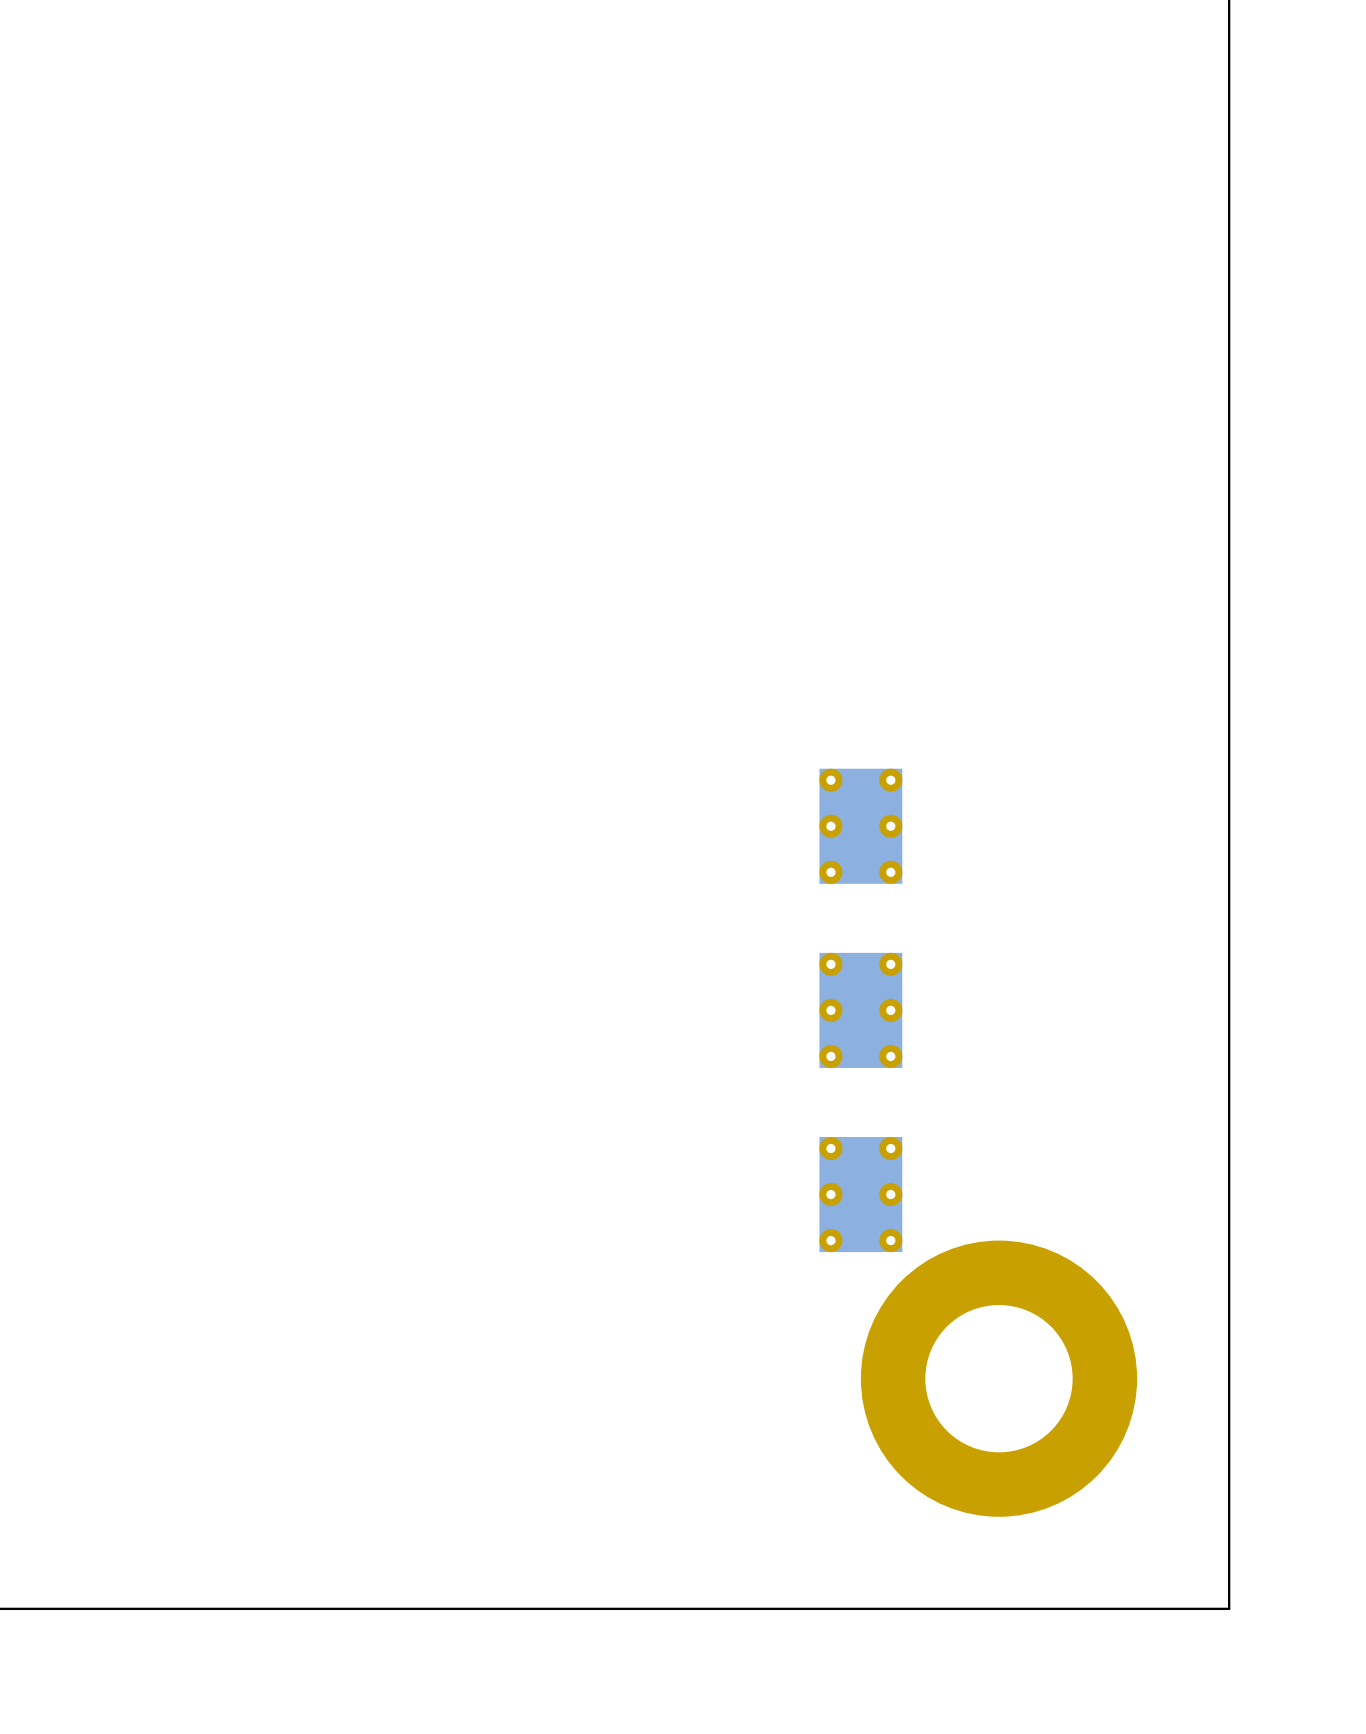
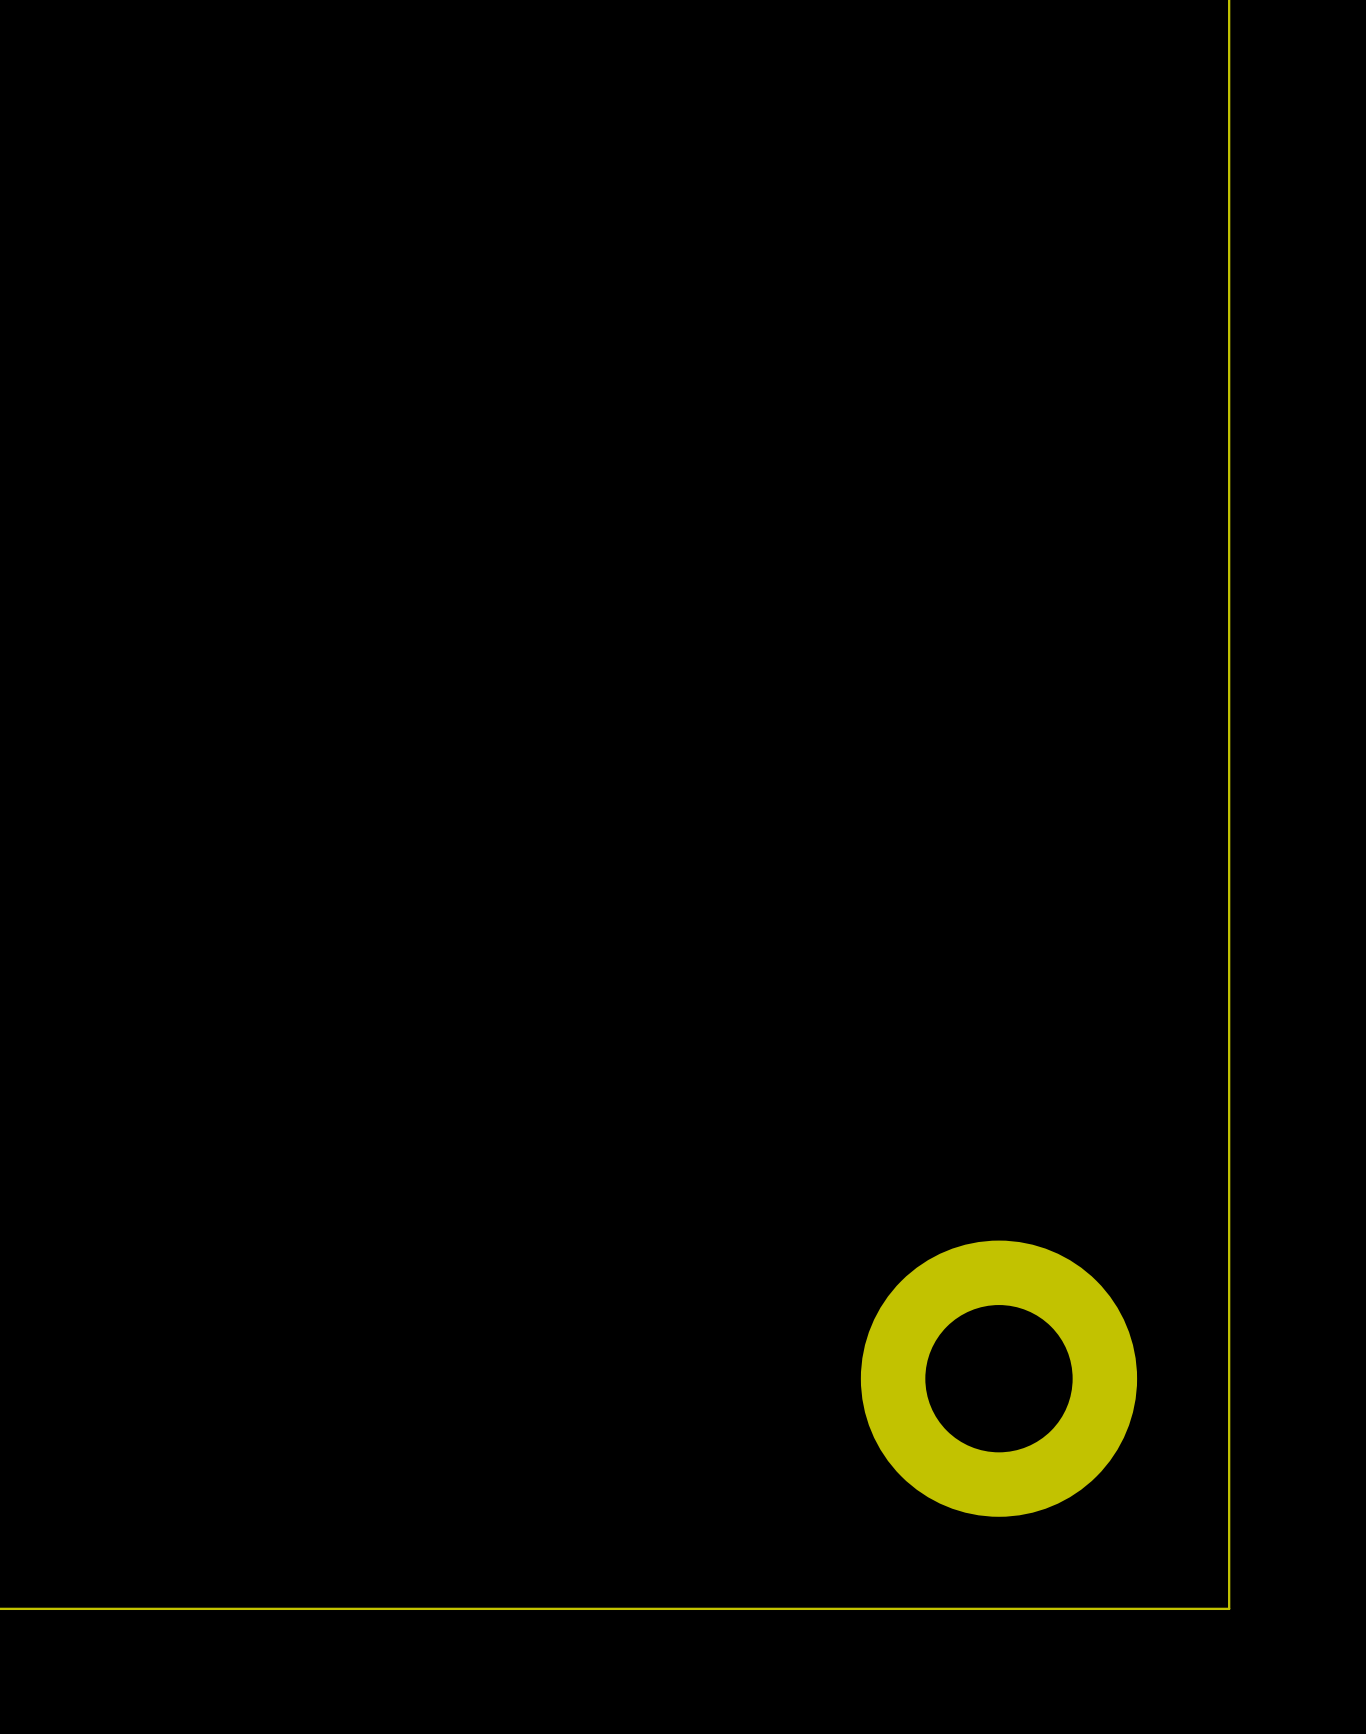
part: (860, 826) -> none
part: (860, 1010) -> none
part: (860, 1194) -> none

